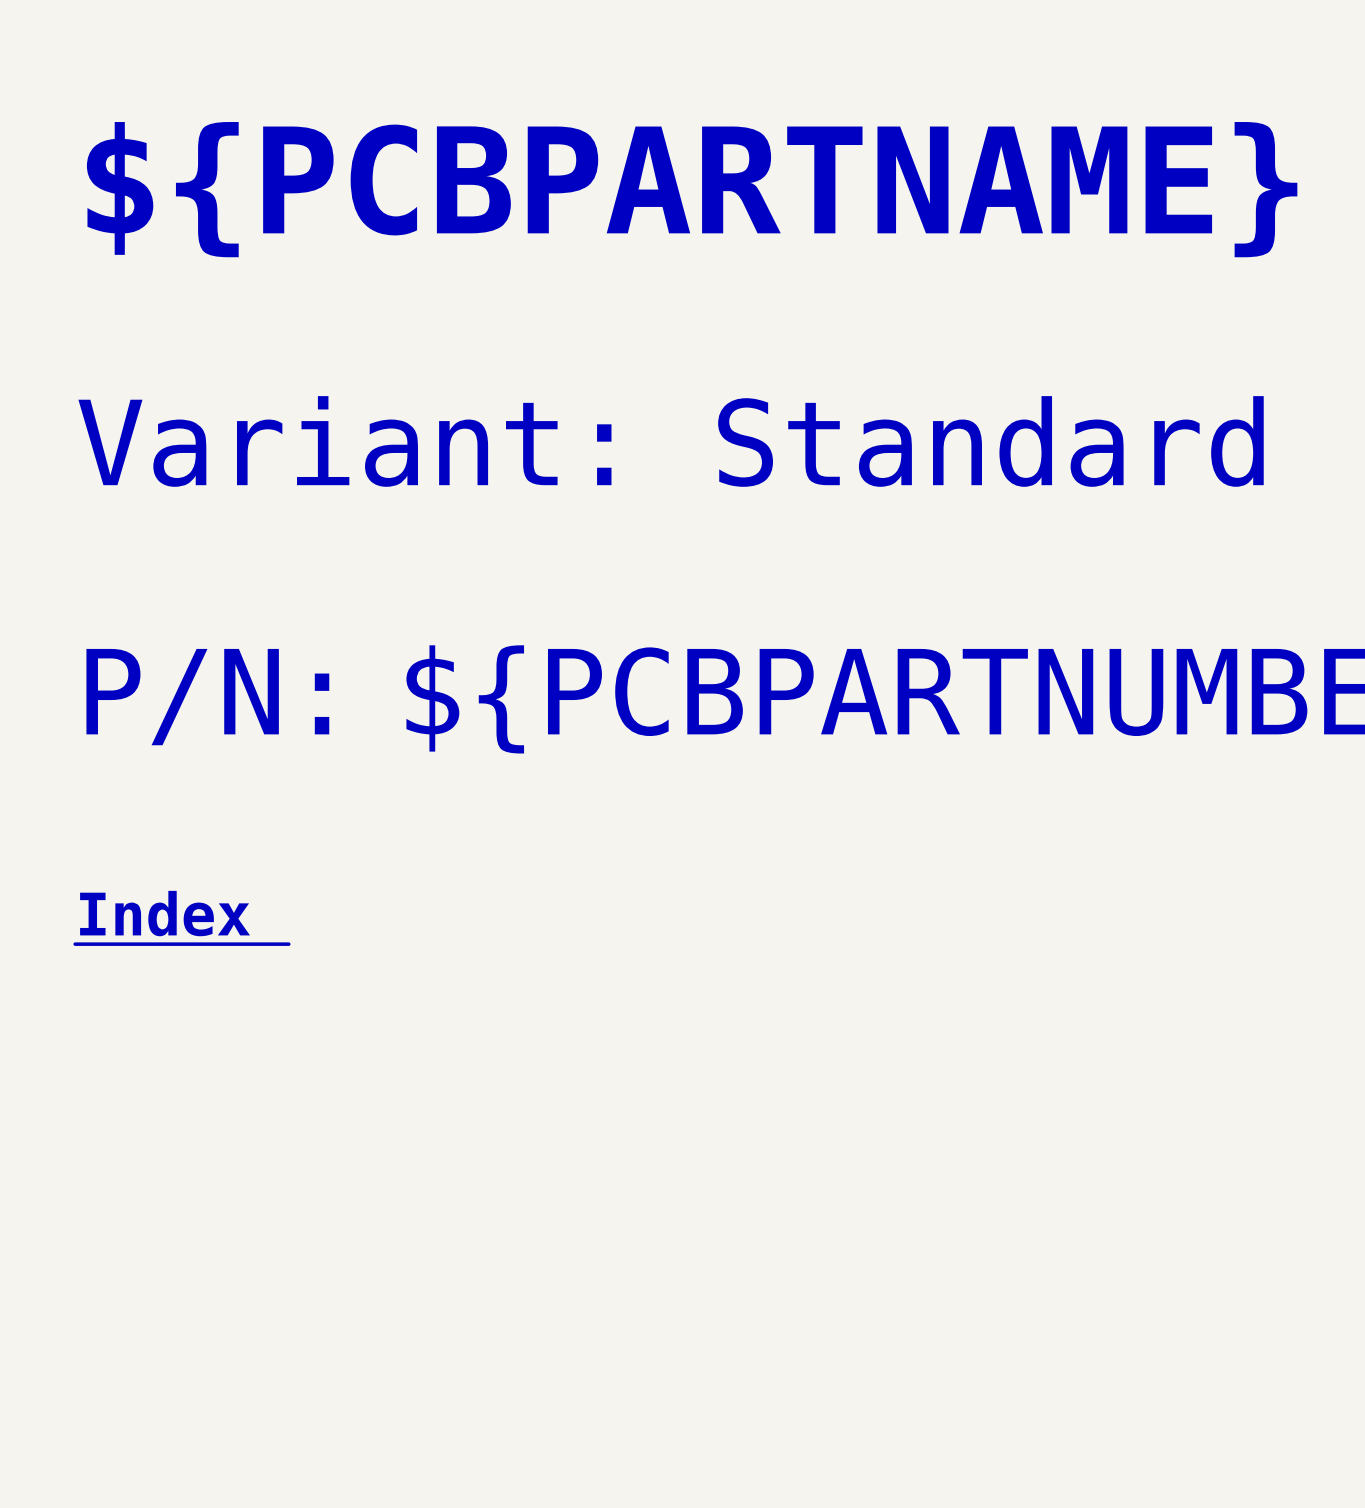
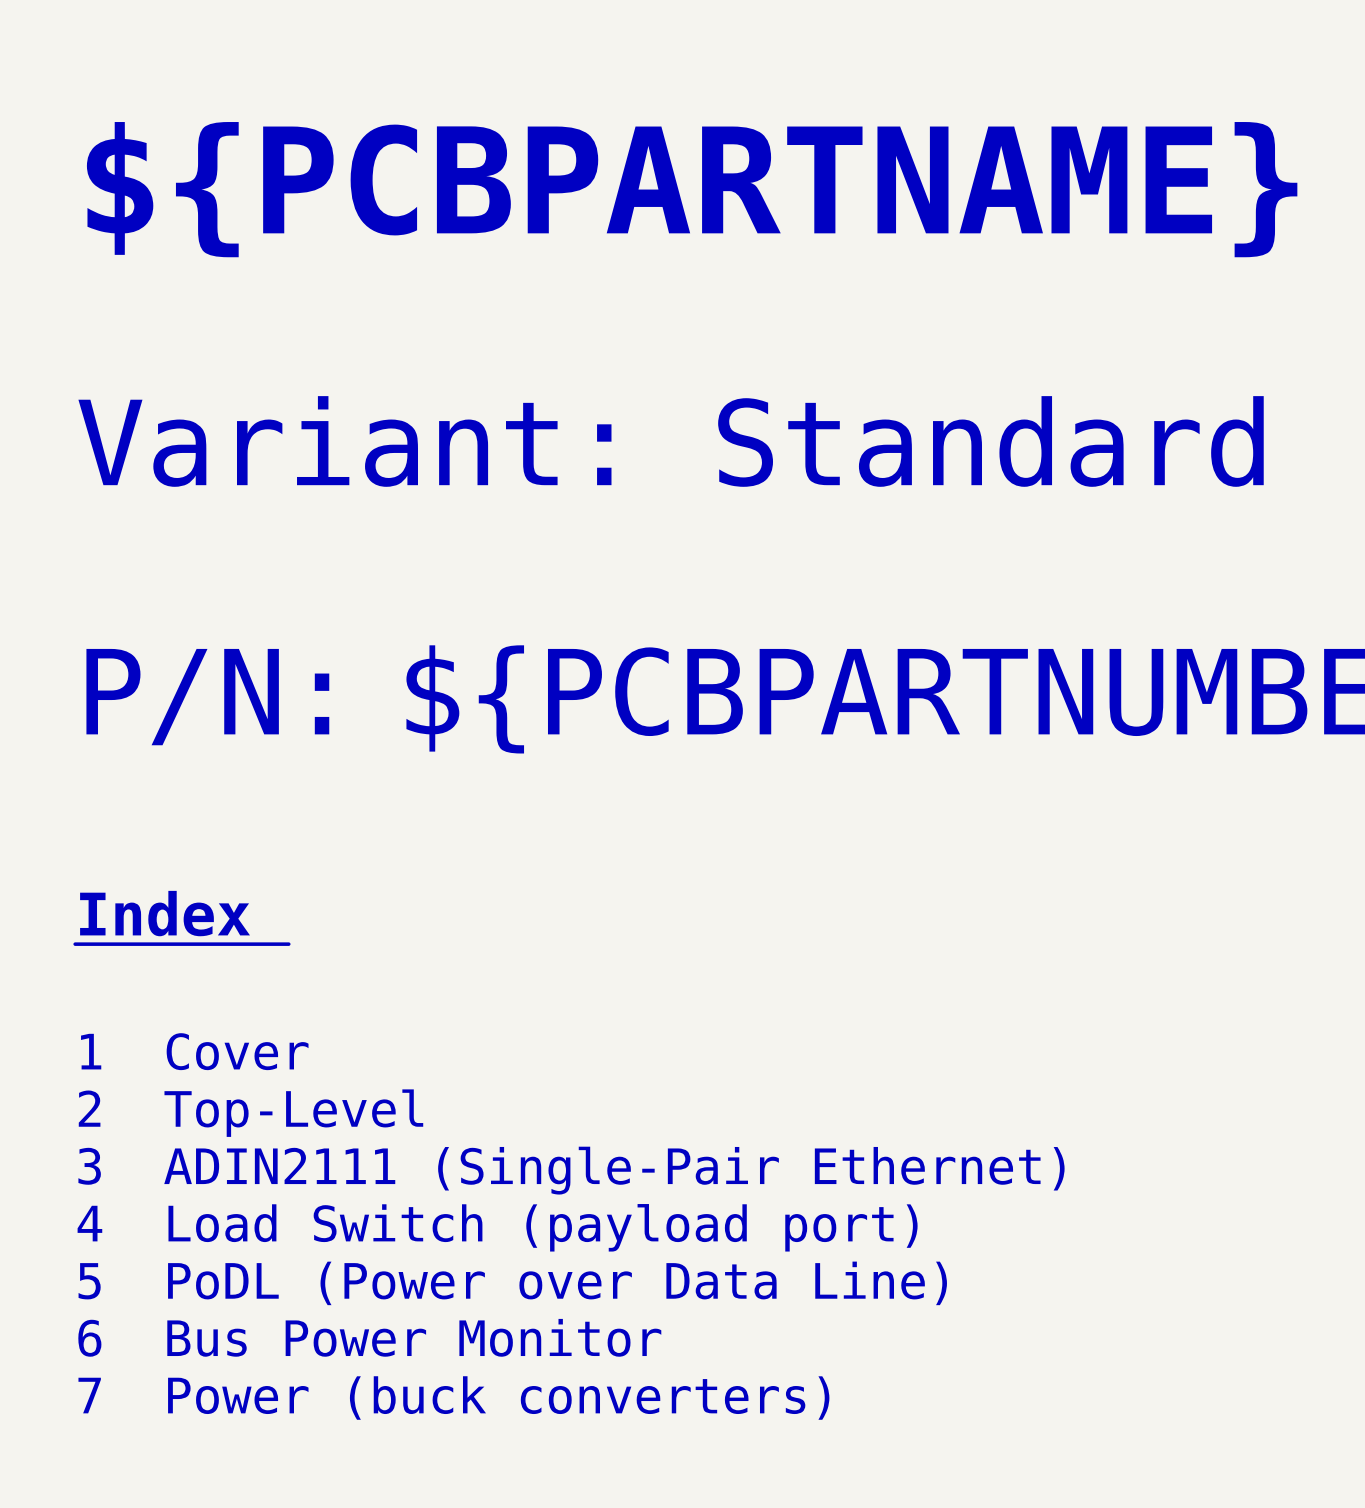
text: none -> 1 Cover (194, 1051)
text: none -> 2 Top-Level (251, 1113)
text: none -> 3 ADIN2111 (Single-Pair Ethernet) (571, 1170)
text: none -> 4 Load Switch (payload port) (497, 1227)
text: none -> 5 PoDL (Power over Data Line) (512, 1283)
text: none -> 6 Bus Power Monitor (369, 1337)
text: none -> 7 Power (buck converters) (453, 1398)

